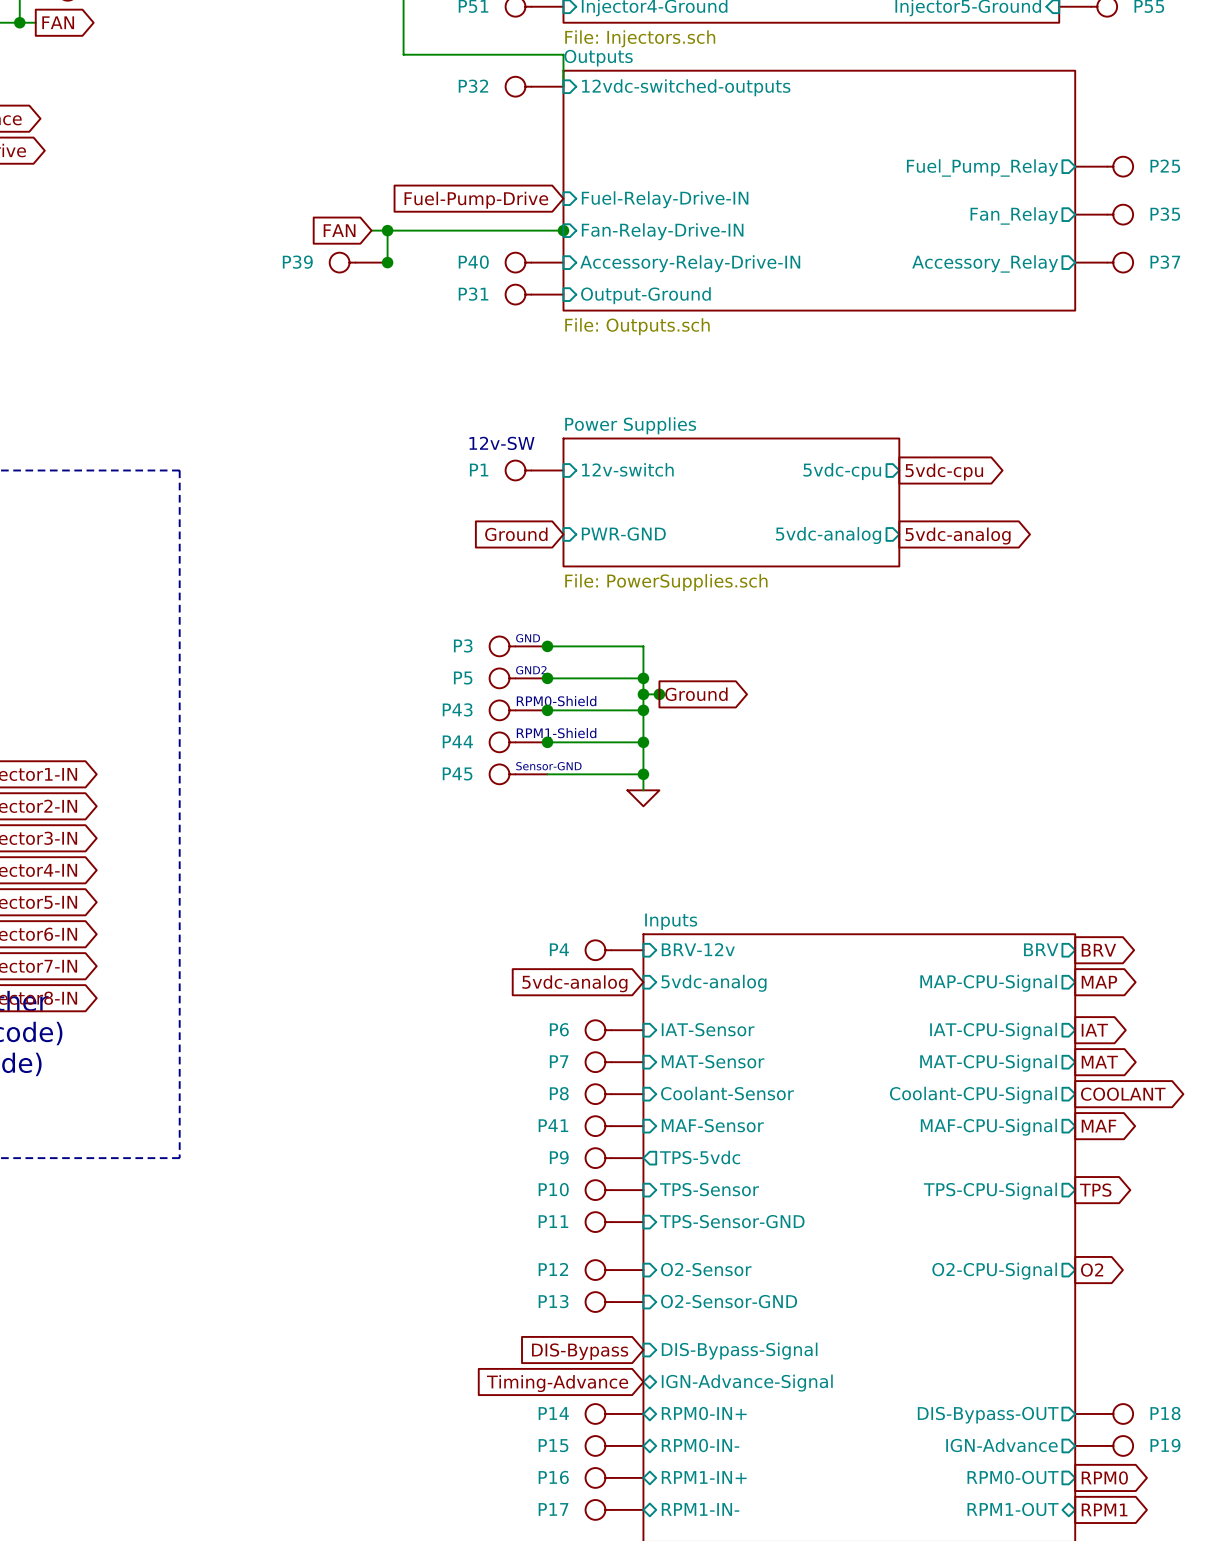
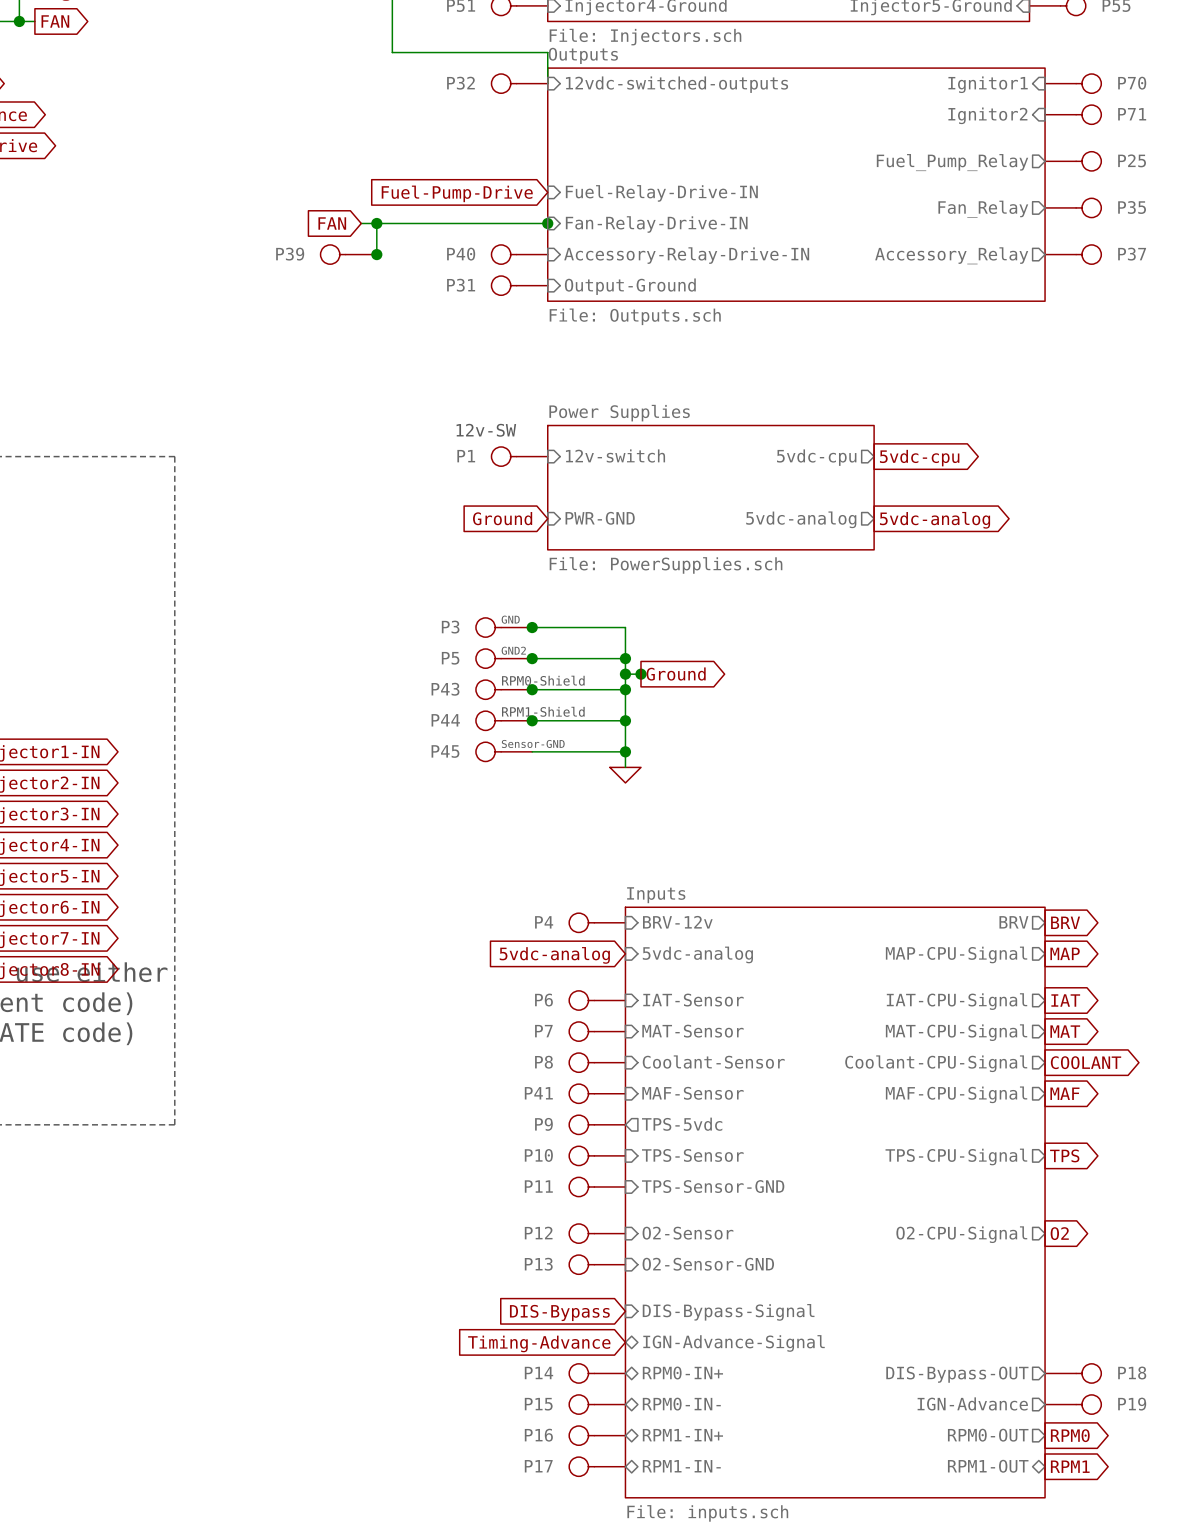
P70: none -> (1073, 83)
sheet pin: none -> Ignitor1 (988, 84)
P71: none -> (1073, 114)
sheet pin: none -> Ignitor2 (987, 115)

